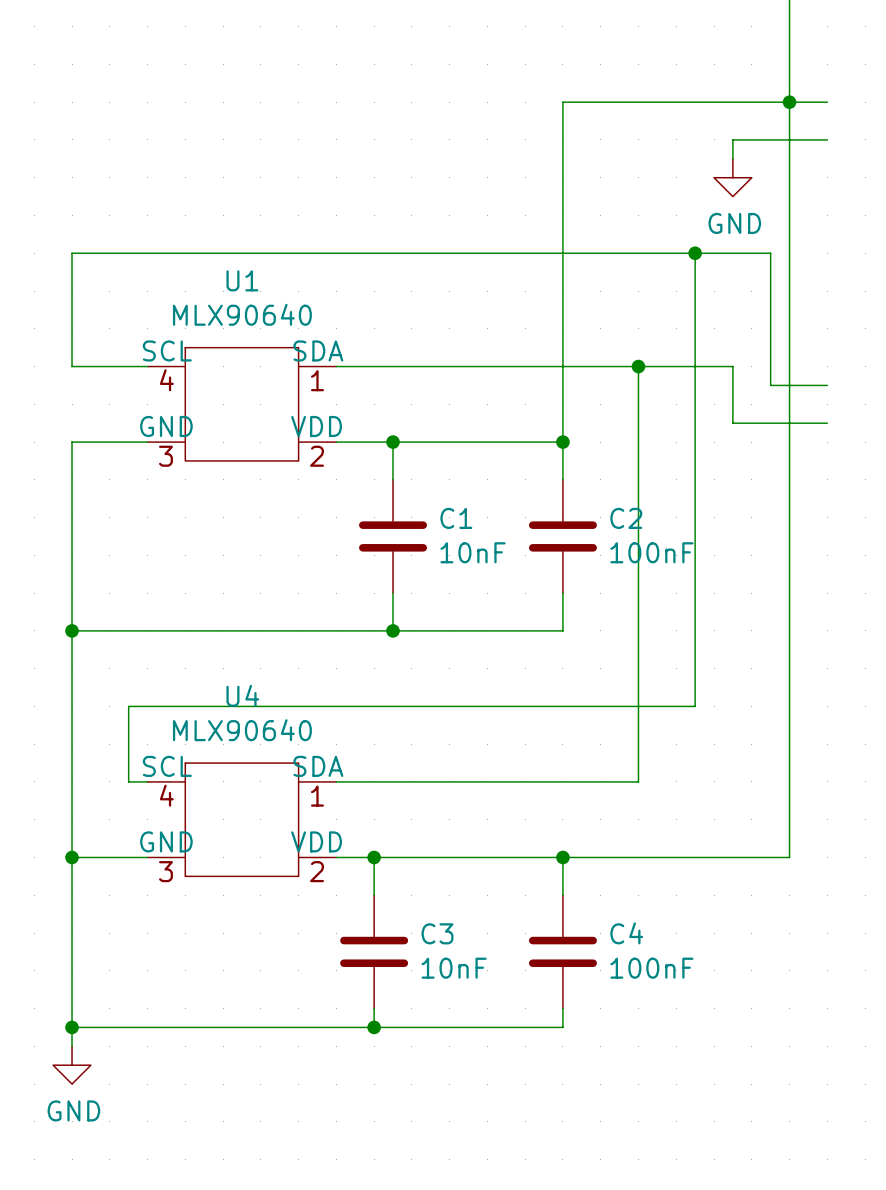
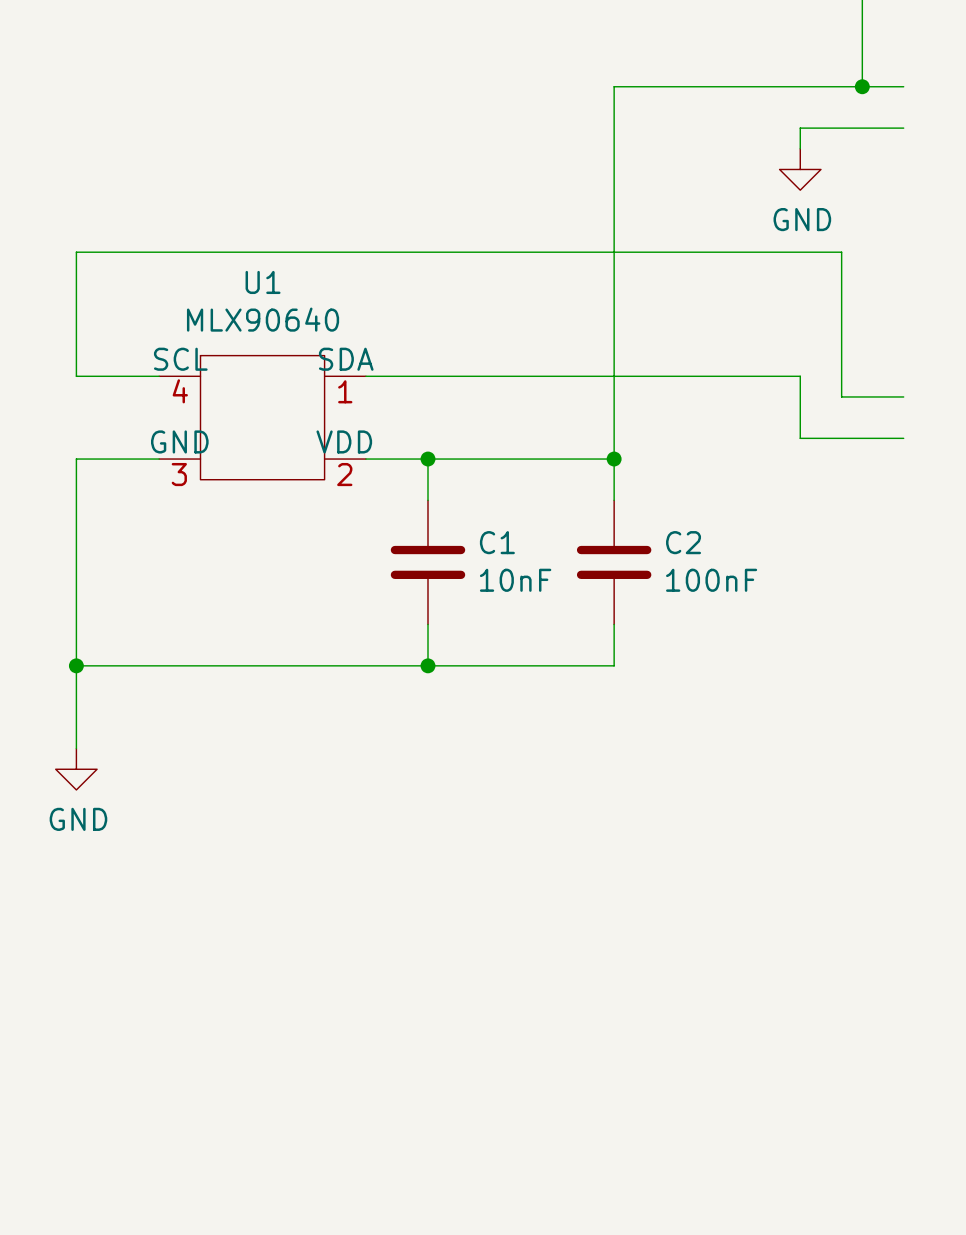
wire: (789, 102) (789, 857) (336, 857) -> none
wire: (695, 253) (695, 706) (128, 706) (128, 781) (147, 781) -> none
junction: (695, 253) -> none
wire: (638, 366) (638, 781) (336, 781) -> none
junction: (638, 366) -> none
wire: (72, 706) (72, 1046) -> none
U4: MLX90640 (241, 819) -> none
wire: (72, 857) (147, 857) -> none
junction: (72, 857) -> none
wire: (374, 857) (374, 895) -> none
junction: (374, 857) -> none
wire: (562, 857) (562, 895) -> none
junction: (562, 857) -> none
C3: 10nF (374, 951) -> none
C4: 100nF (562, 951) -> none
wire: (374, 1008) (374, 1027) -> none
wire: (562, 1008) (562, 1027) (72, 1027) -> none
junction: (72, 1027) -> none
junction: (374, 1027) -> none
power symbol position: GND (72, 1065) -> GND (76, 769)

